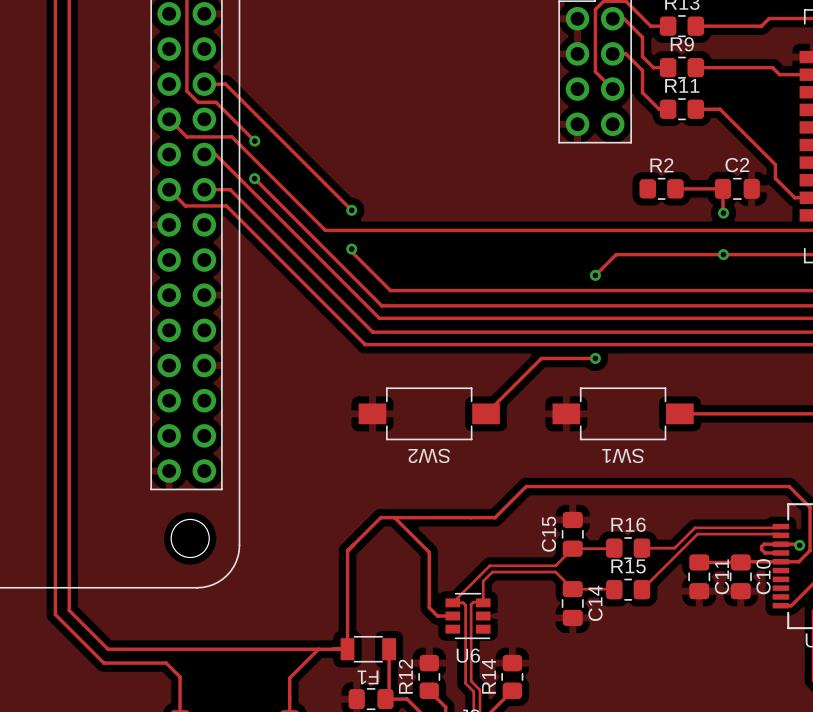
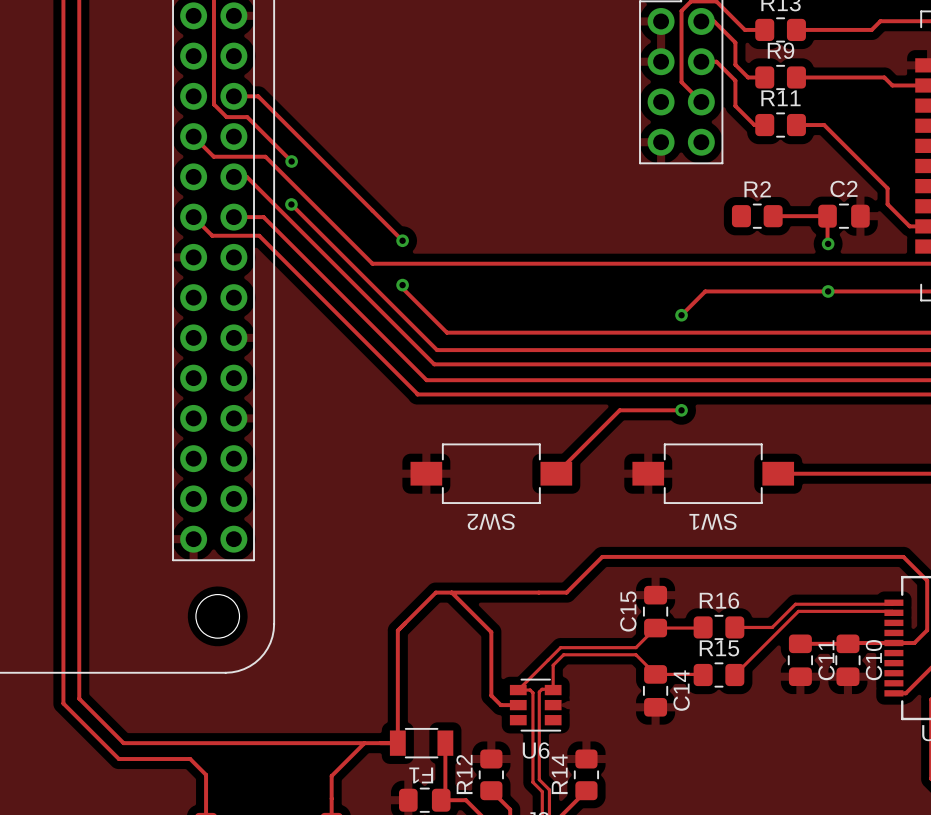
track: (799, 545) (764, 544) (761, 546) (764, 552) (780, 552) -> none
via: (799, 545) -> none

